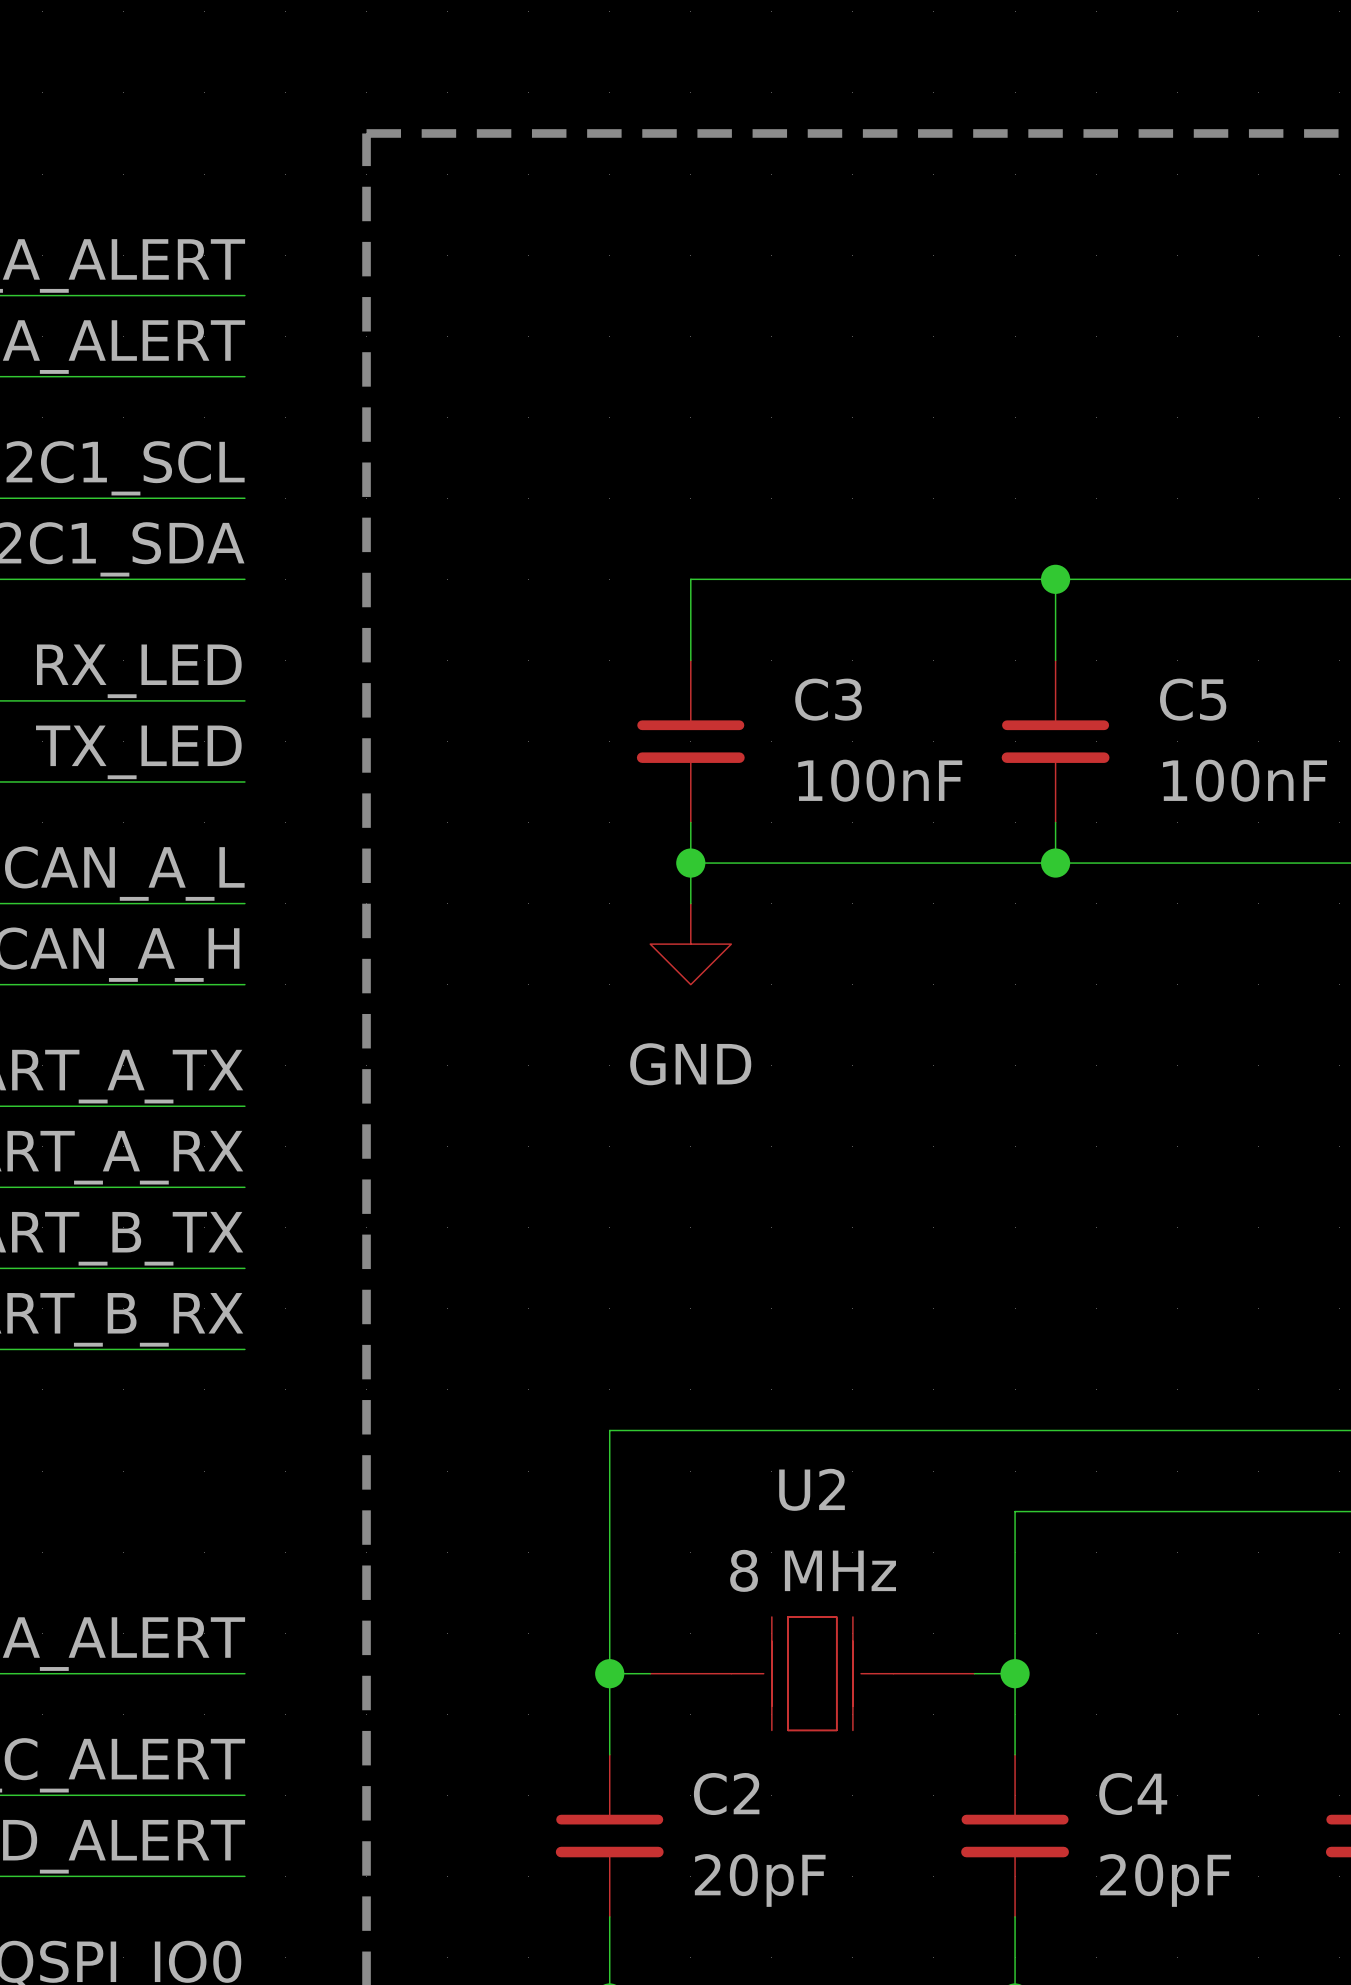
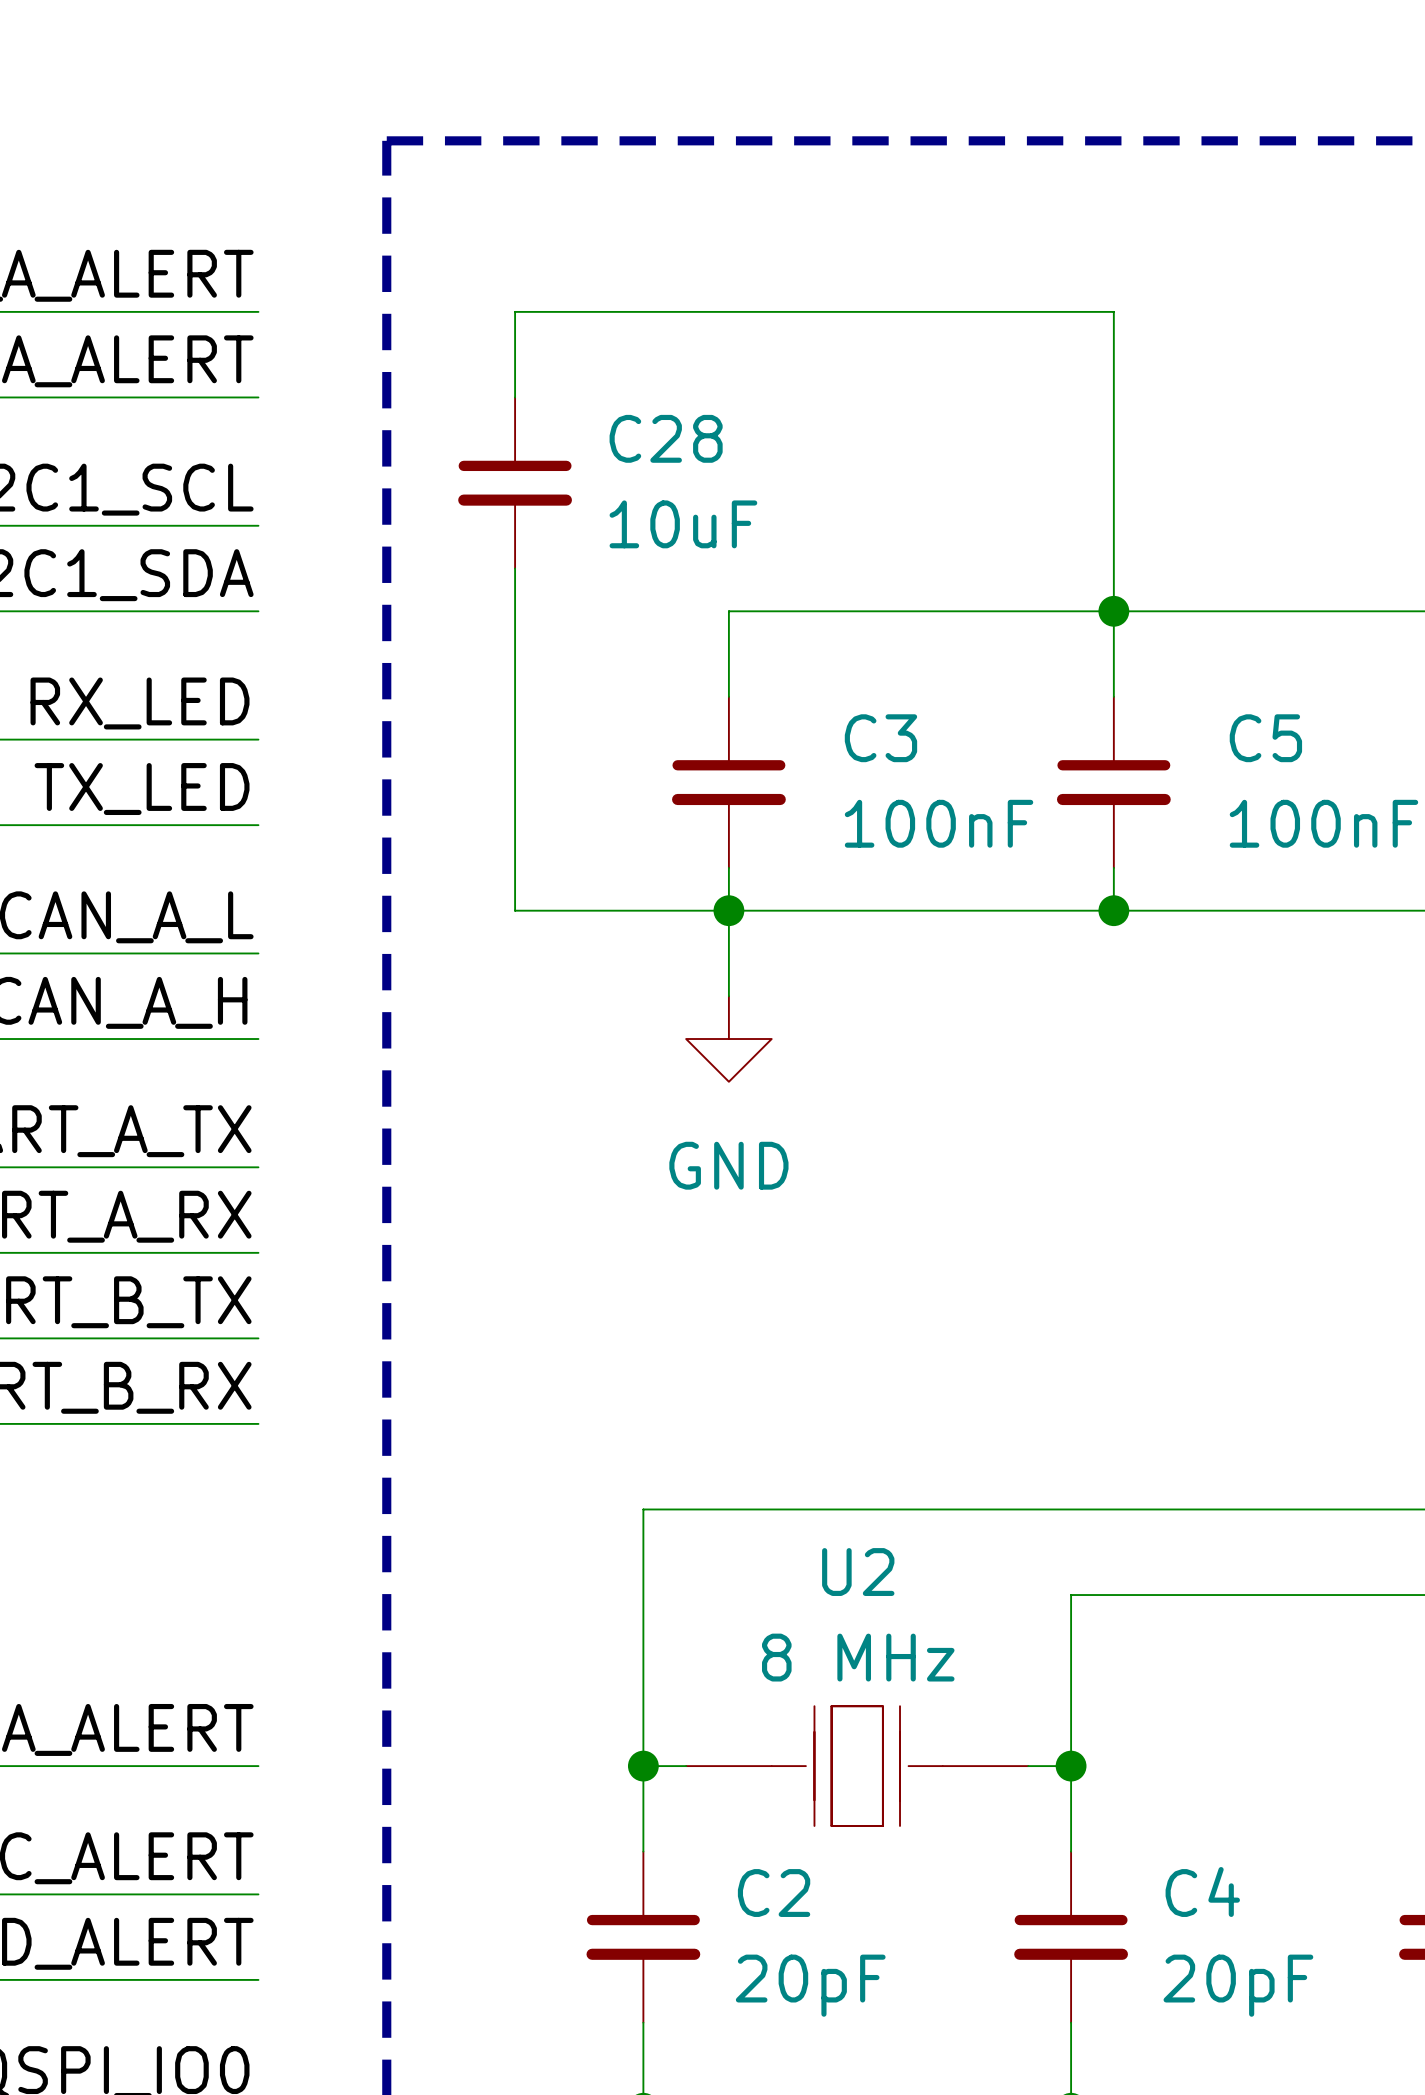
wire: none -> (515, 397) (515, 311) (1113, 311) (1113, 611)
C28: none -> 10uF (515, 482)
wire: none -> (515, 568) (515, 910) (728, 910)
power symbol position: GND (690, 944) -> GND (728, 1039)

